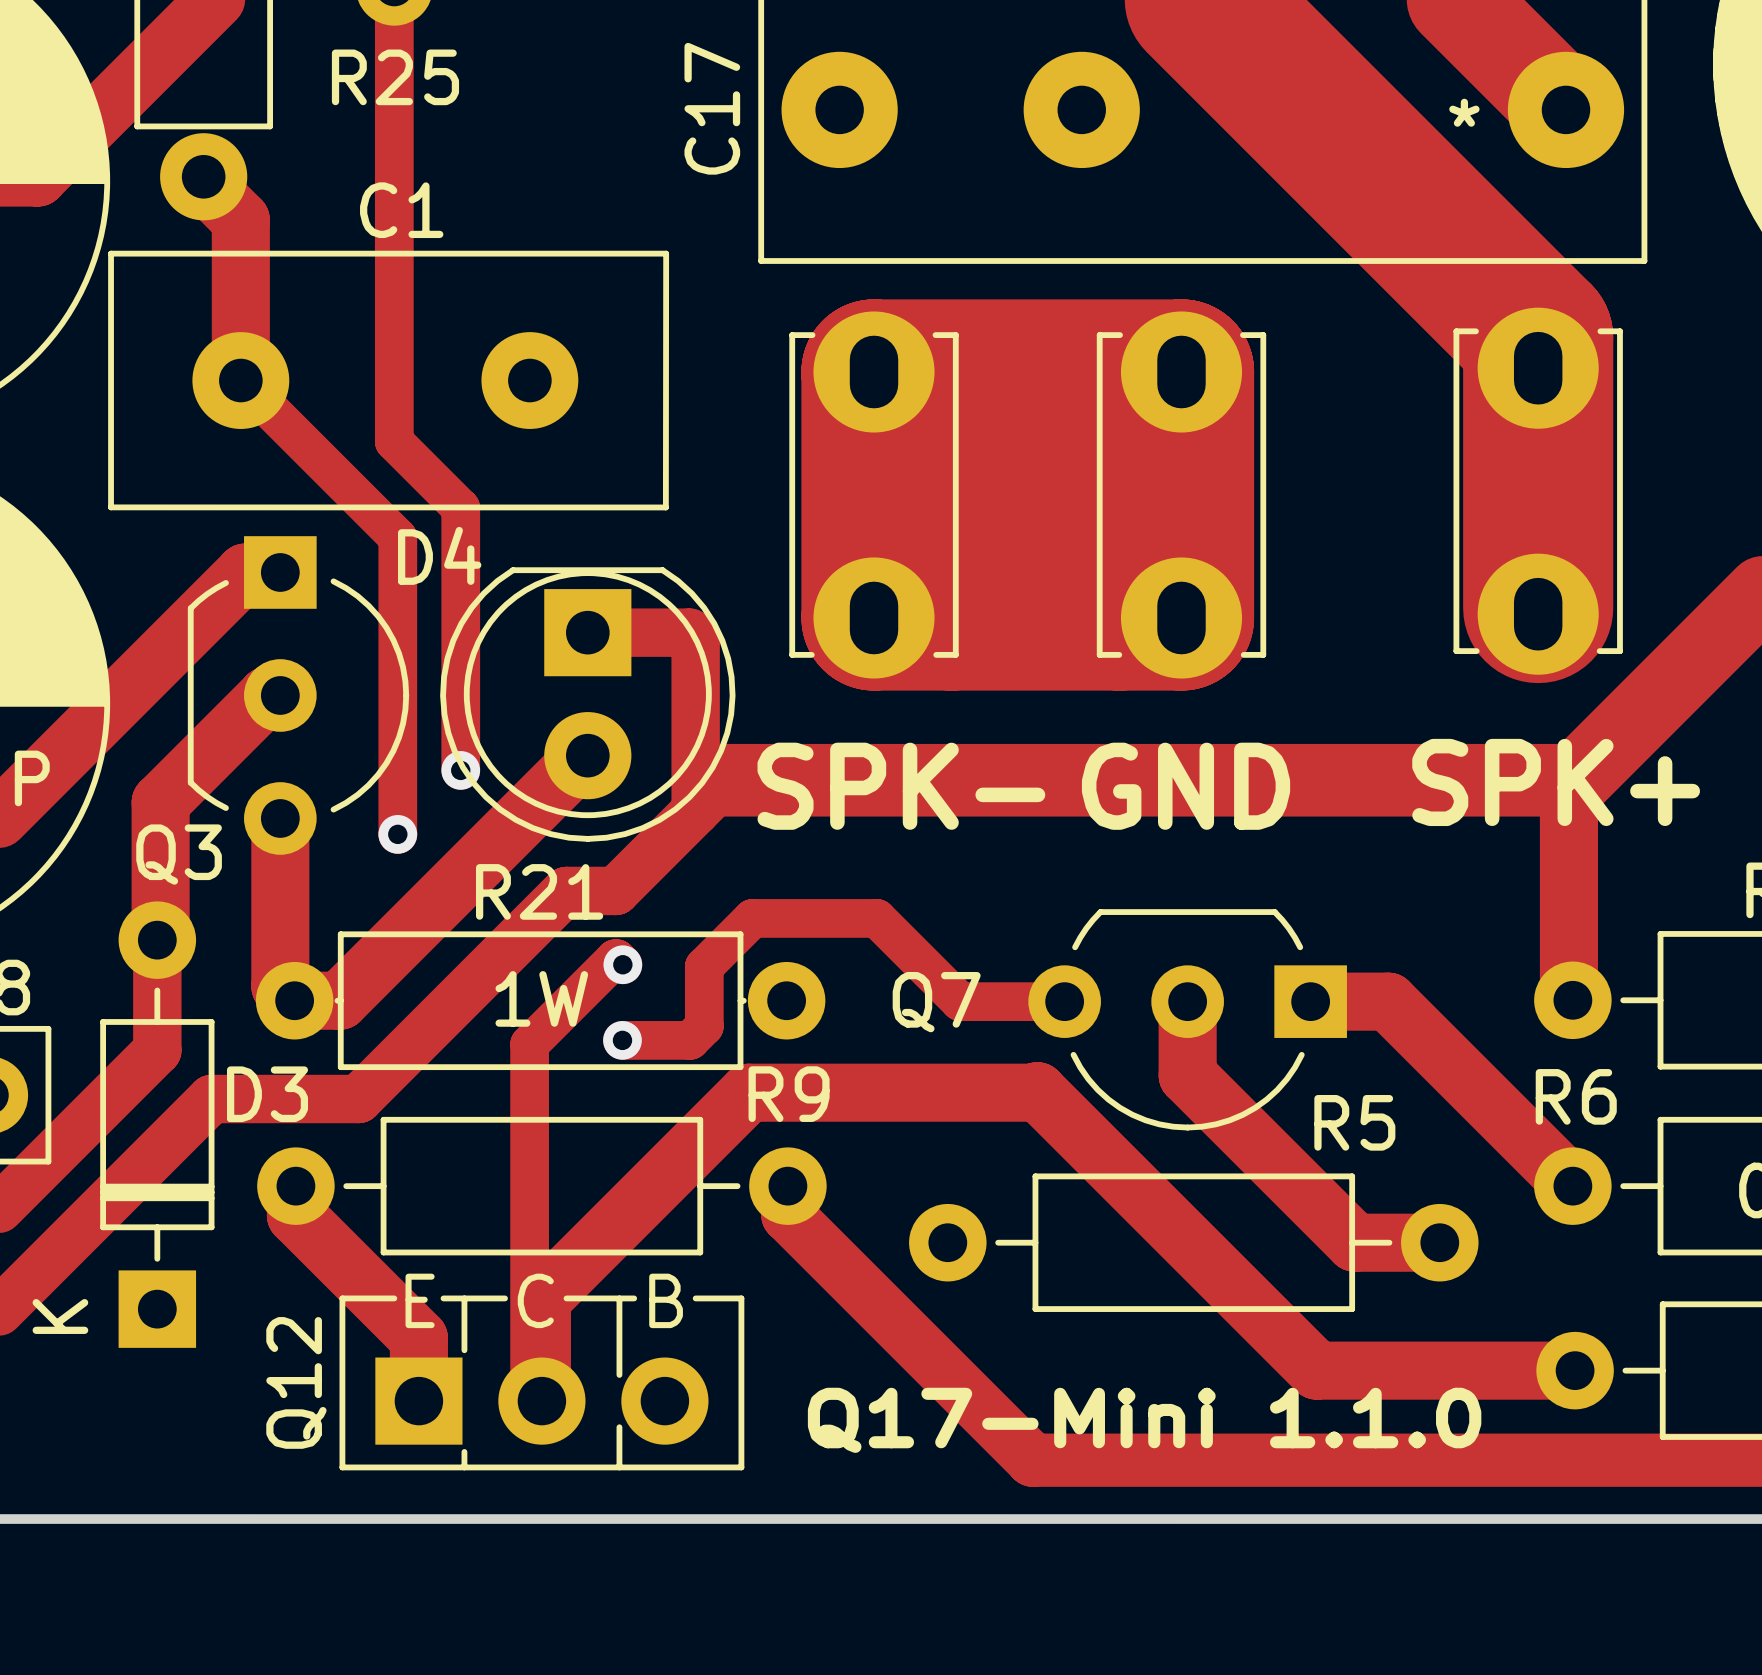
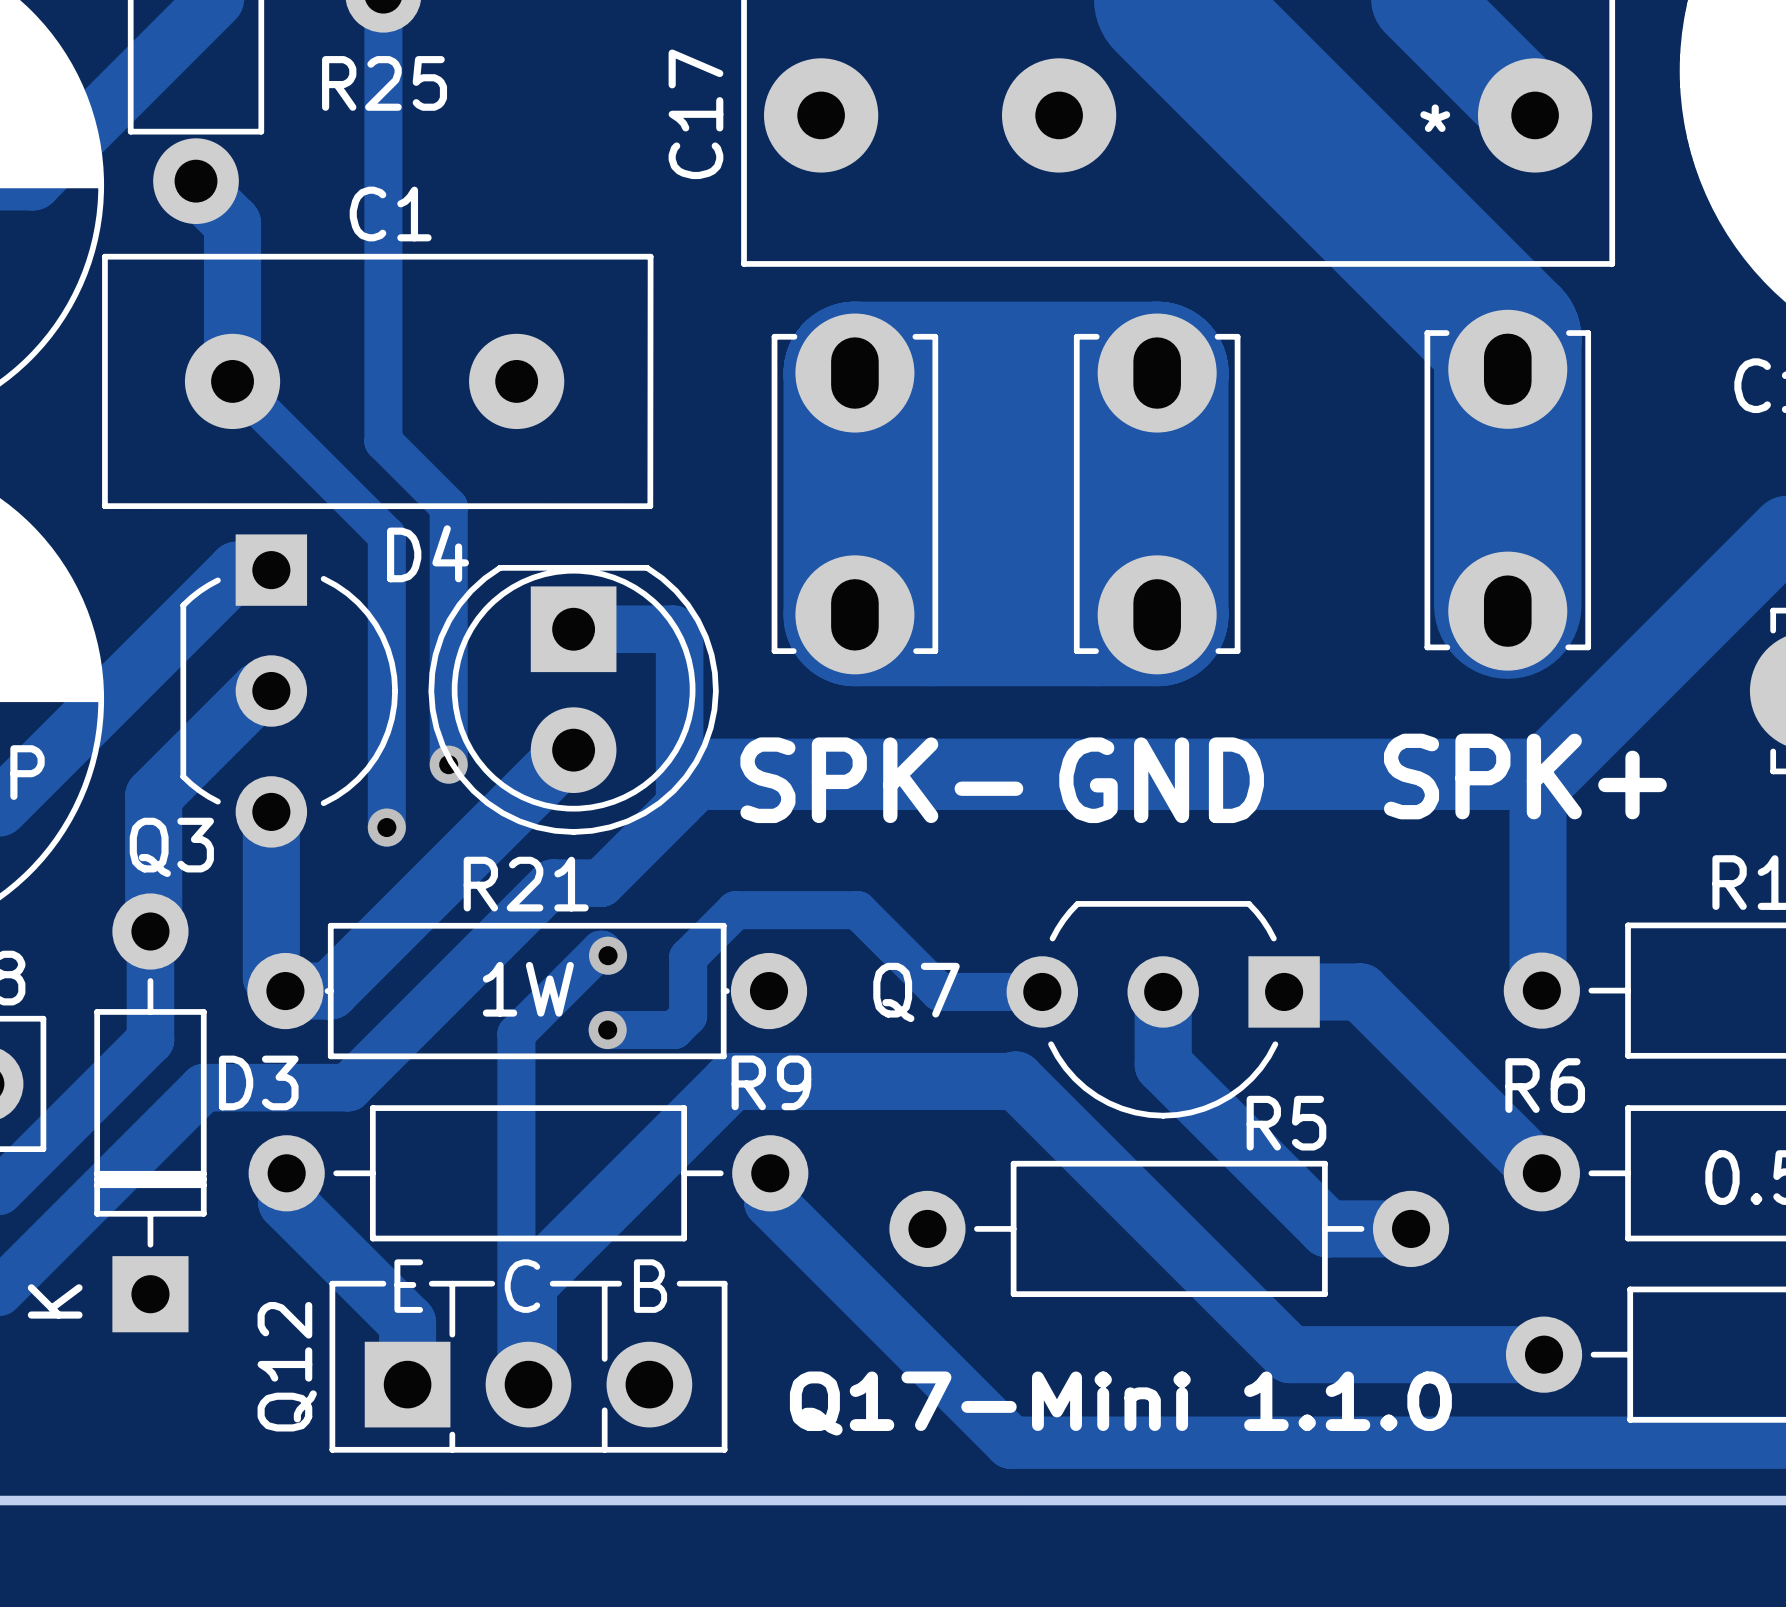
R5 name position: R5 (1354, 1122) -> R5 (1286, 1123)

